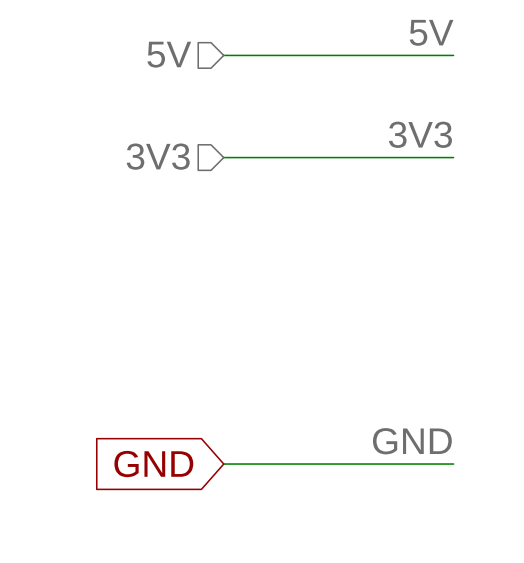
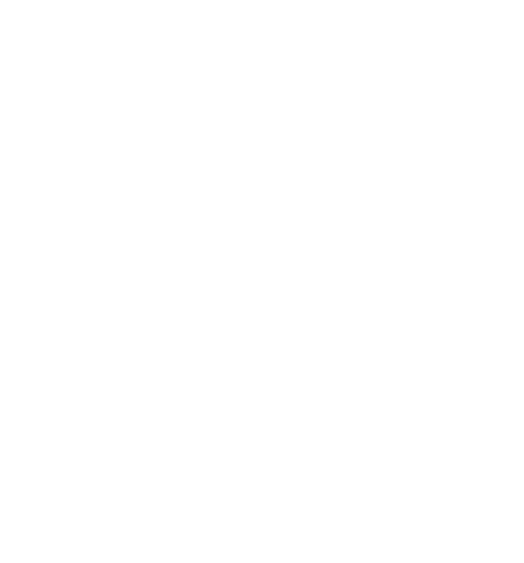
label: 5V (431, 32) -> none
hierarchical label: 5V (169, 54) -> none
wire: (223, 55) (453, 55) -> none
label: 3V3 (420, 134) -> none
hierarchical label: 3V3 (158, 156) -> none
wire: (223, 157) (453, 157) -> none
label: GND (412, 441) -> none
global label: GND (153, 464) -> none
wire: (223, 464) (453, 464) -> none

